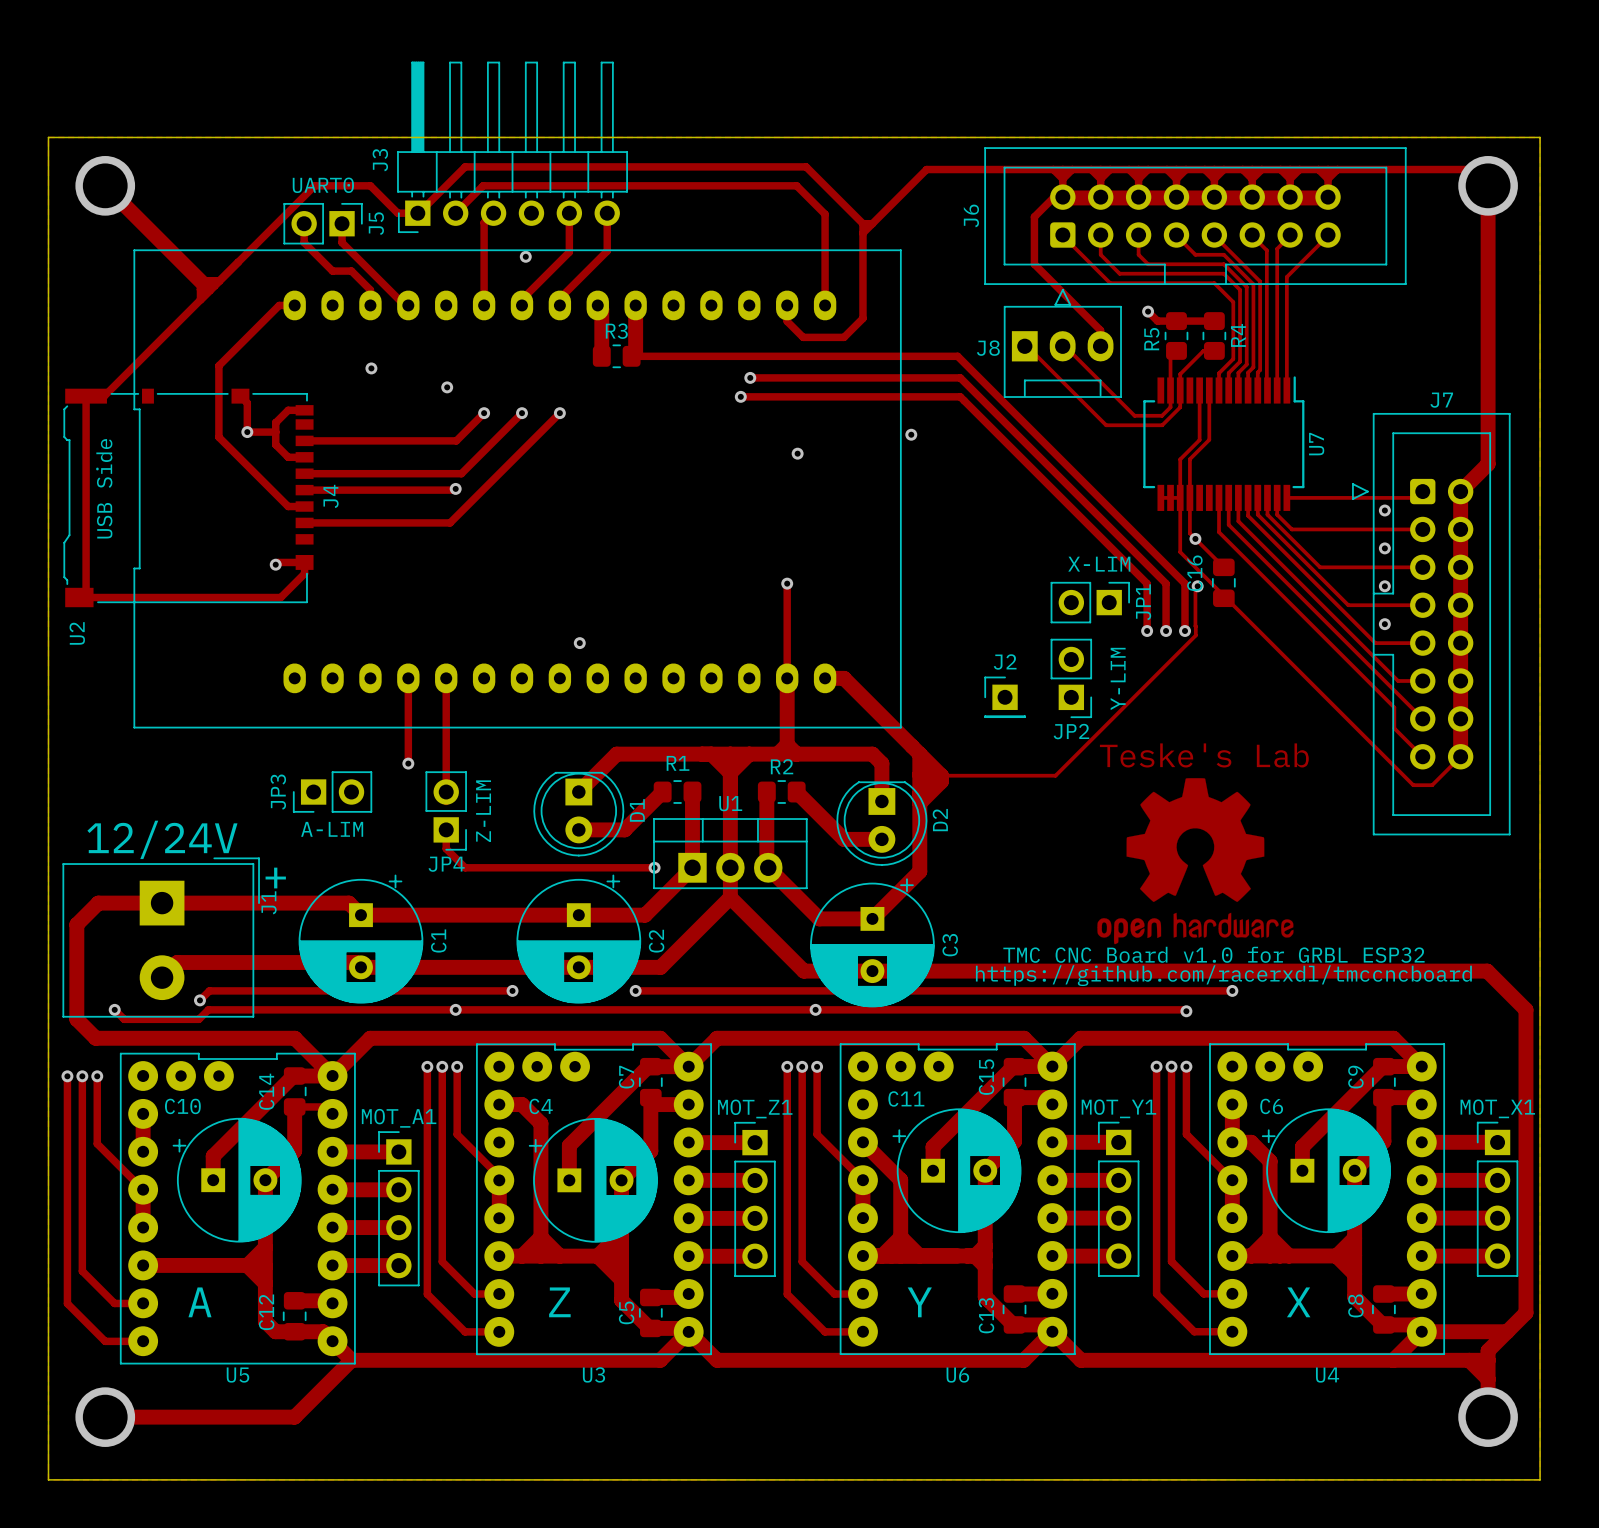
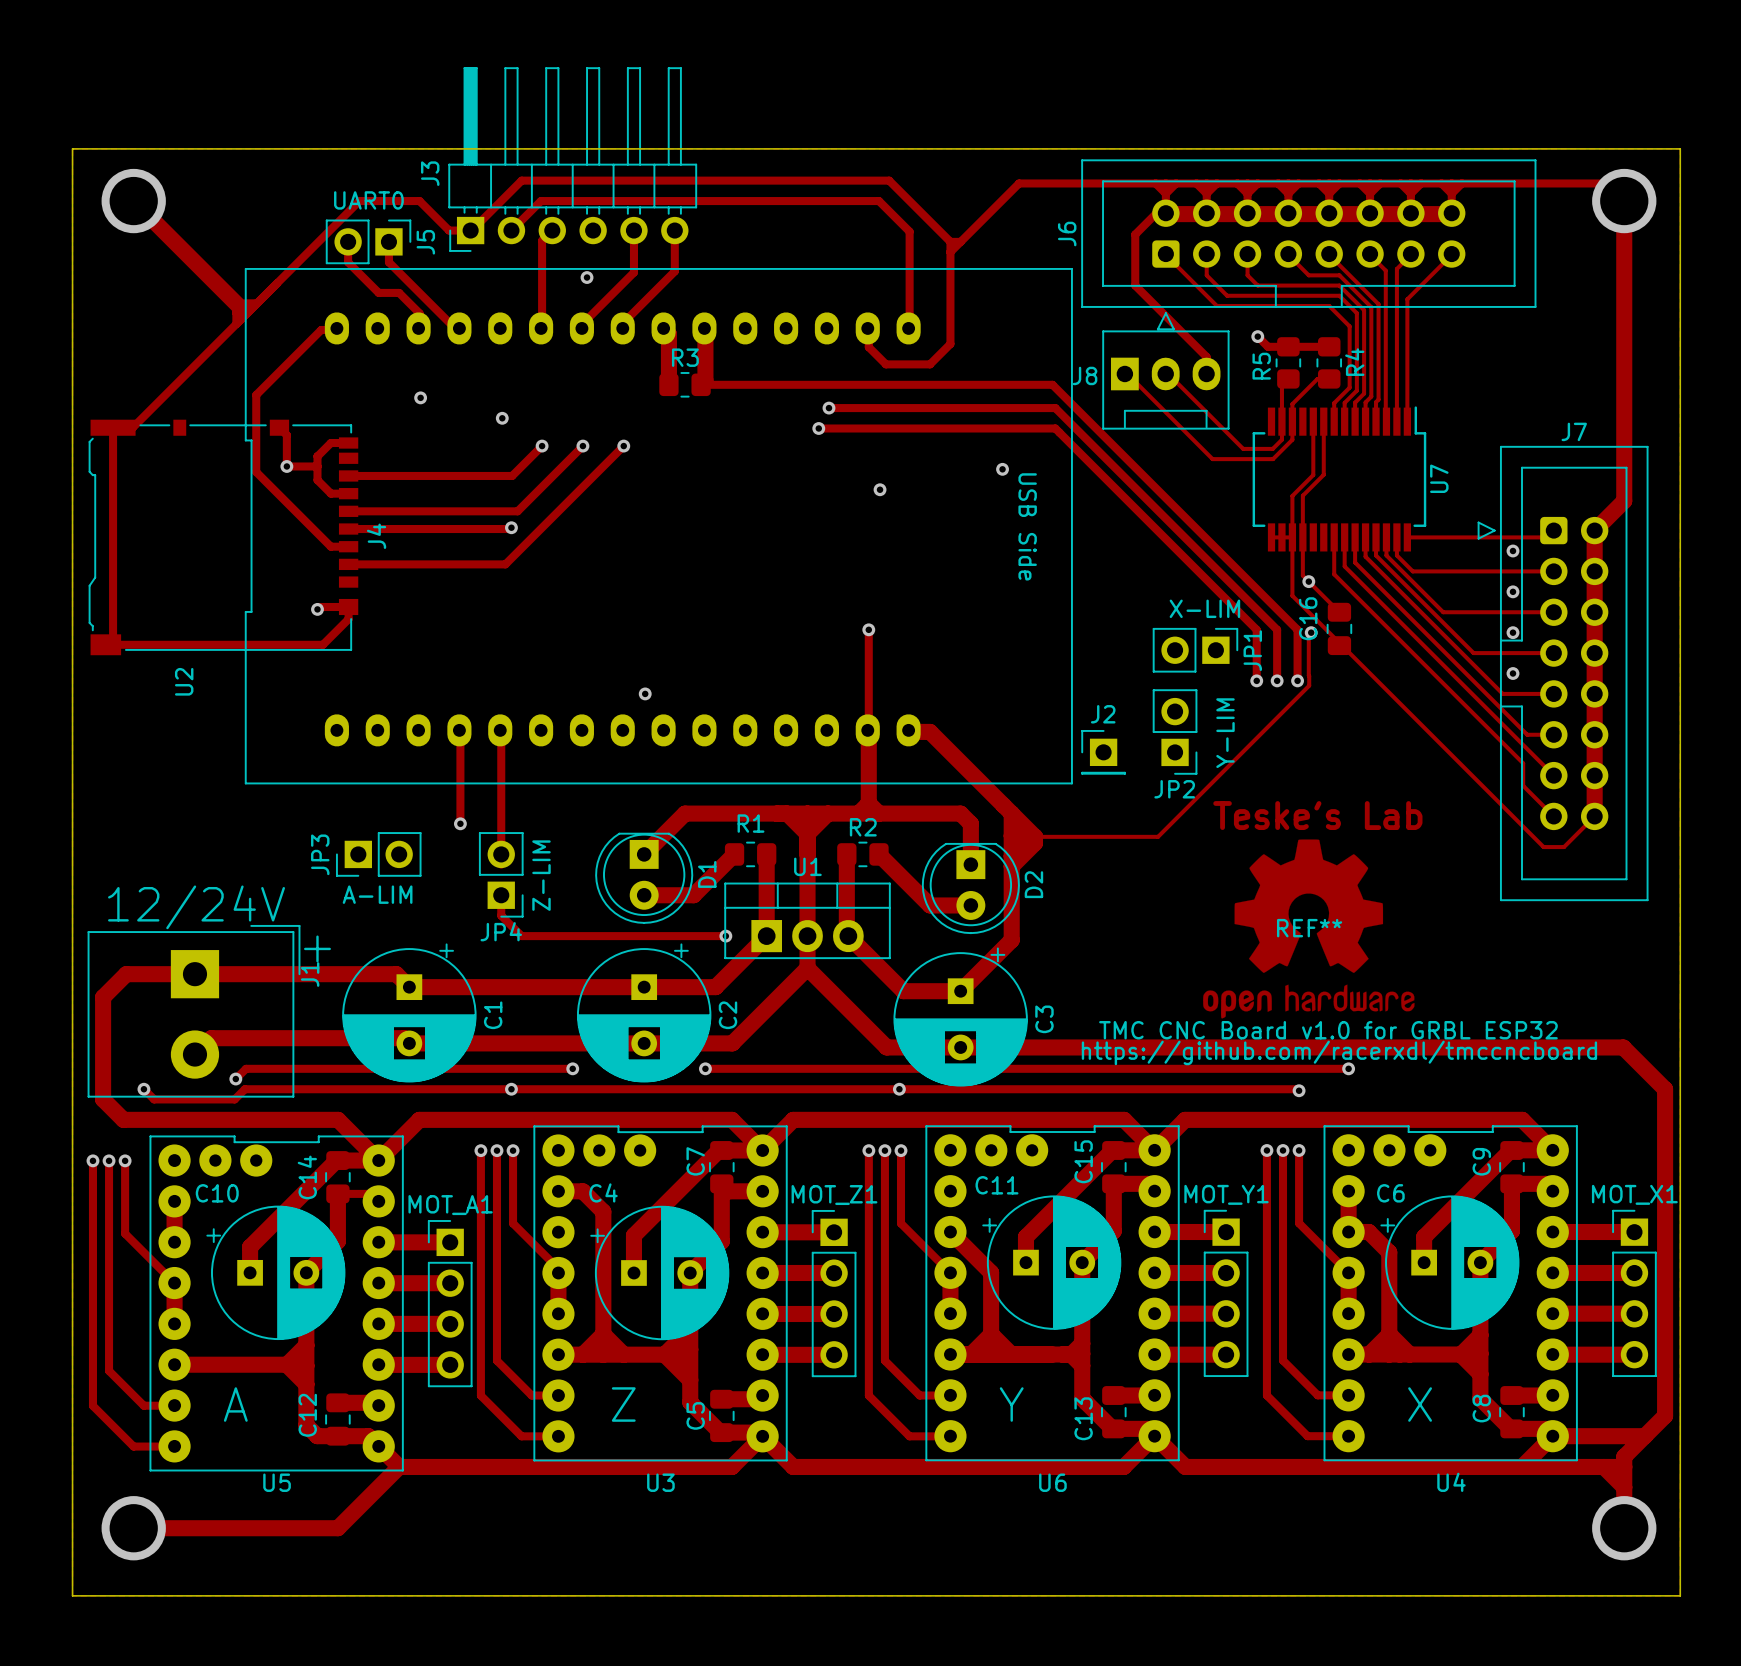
U2 footprint: [133, 249, 902, 729] -> [244, 267, 1073, 785]
drawing: [1097, 778, 1294, 945] -> none
REF**: none -> (1308, 928)

